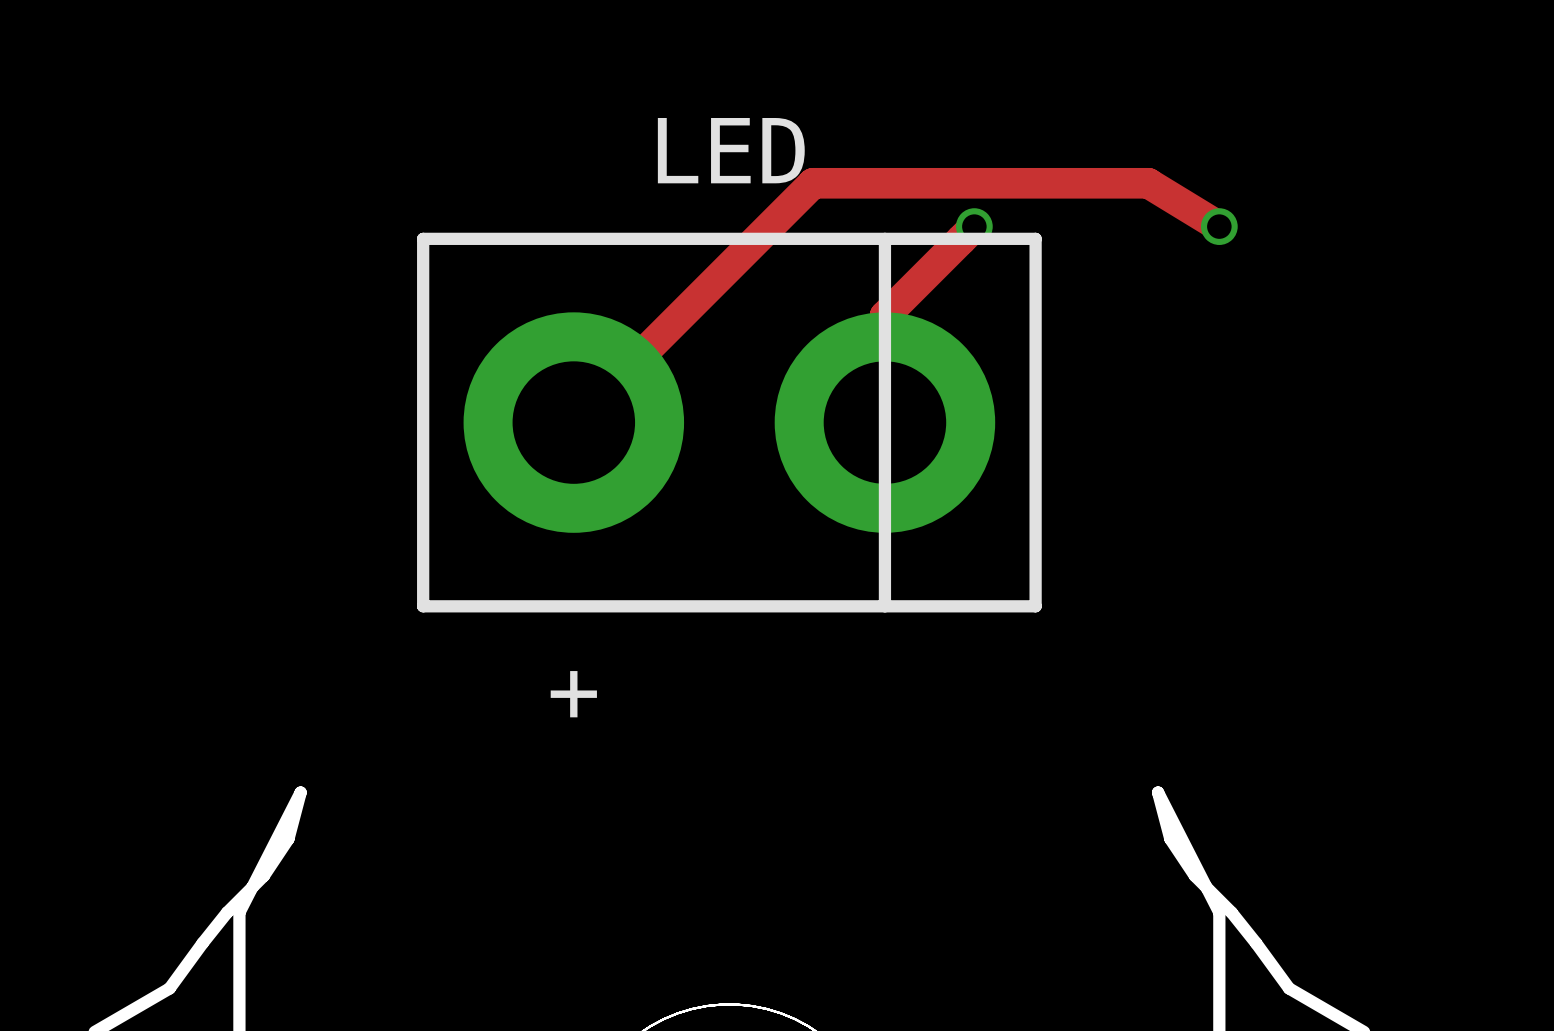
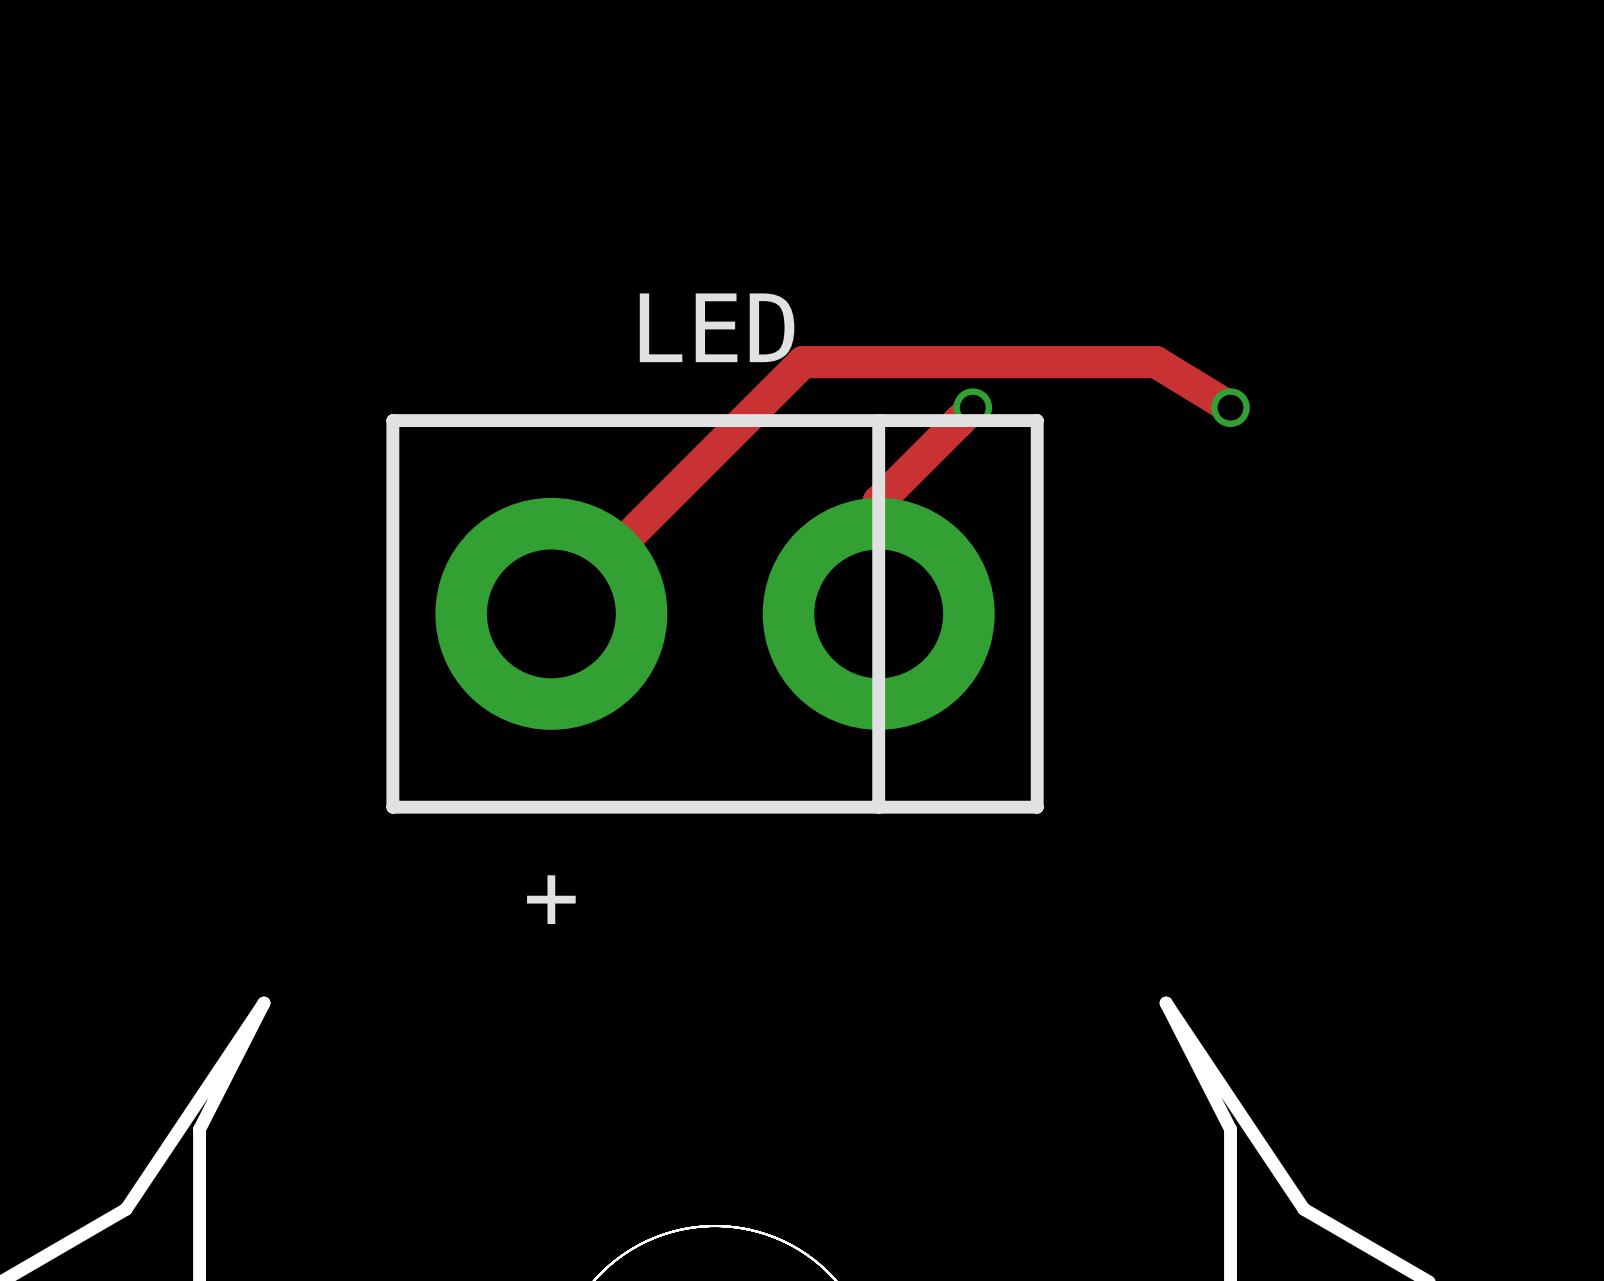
board edge: (300, 792) (288, 839) (263, 875) (227, 912) (169, 988) -> (263, 1003) (126, 1209)
board edge: (1158, 792) (1170, 839) (1194, 875) (1231, 912) (1289, 988) -> (1166, 1003) (1303, 1209)

